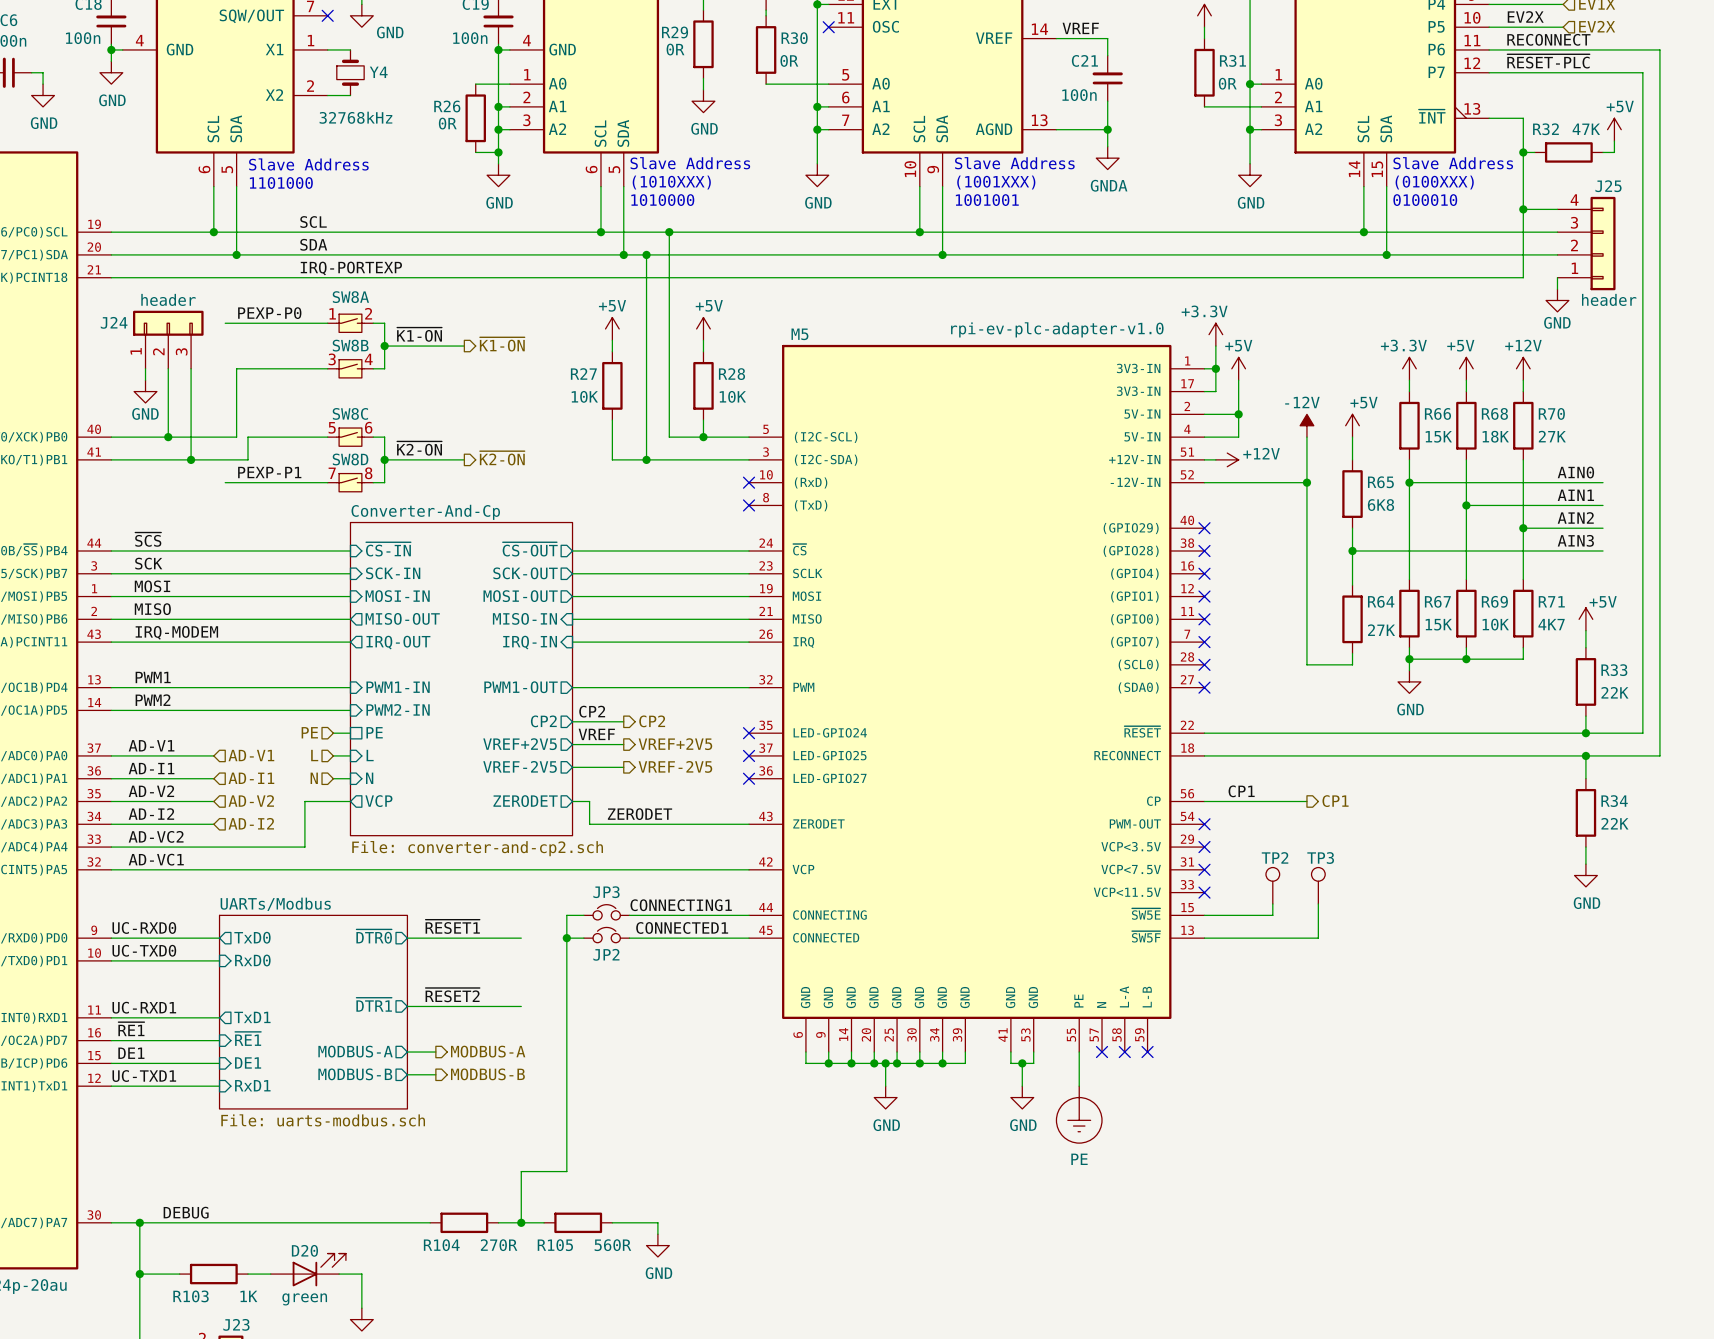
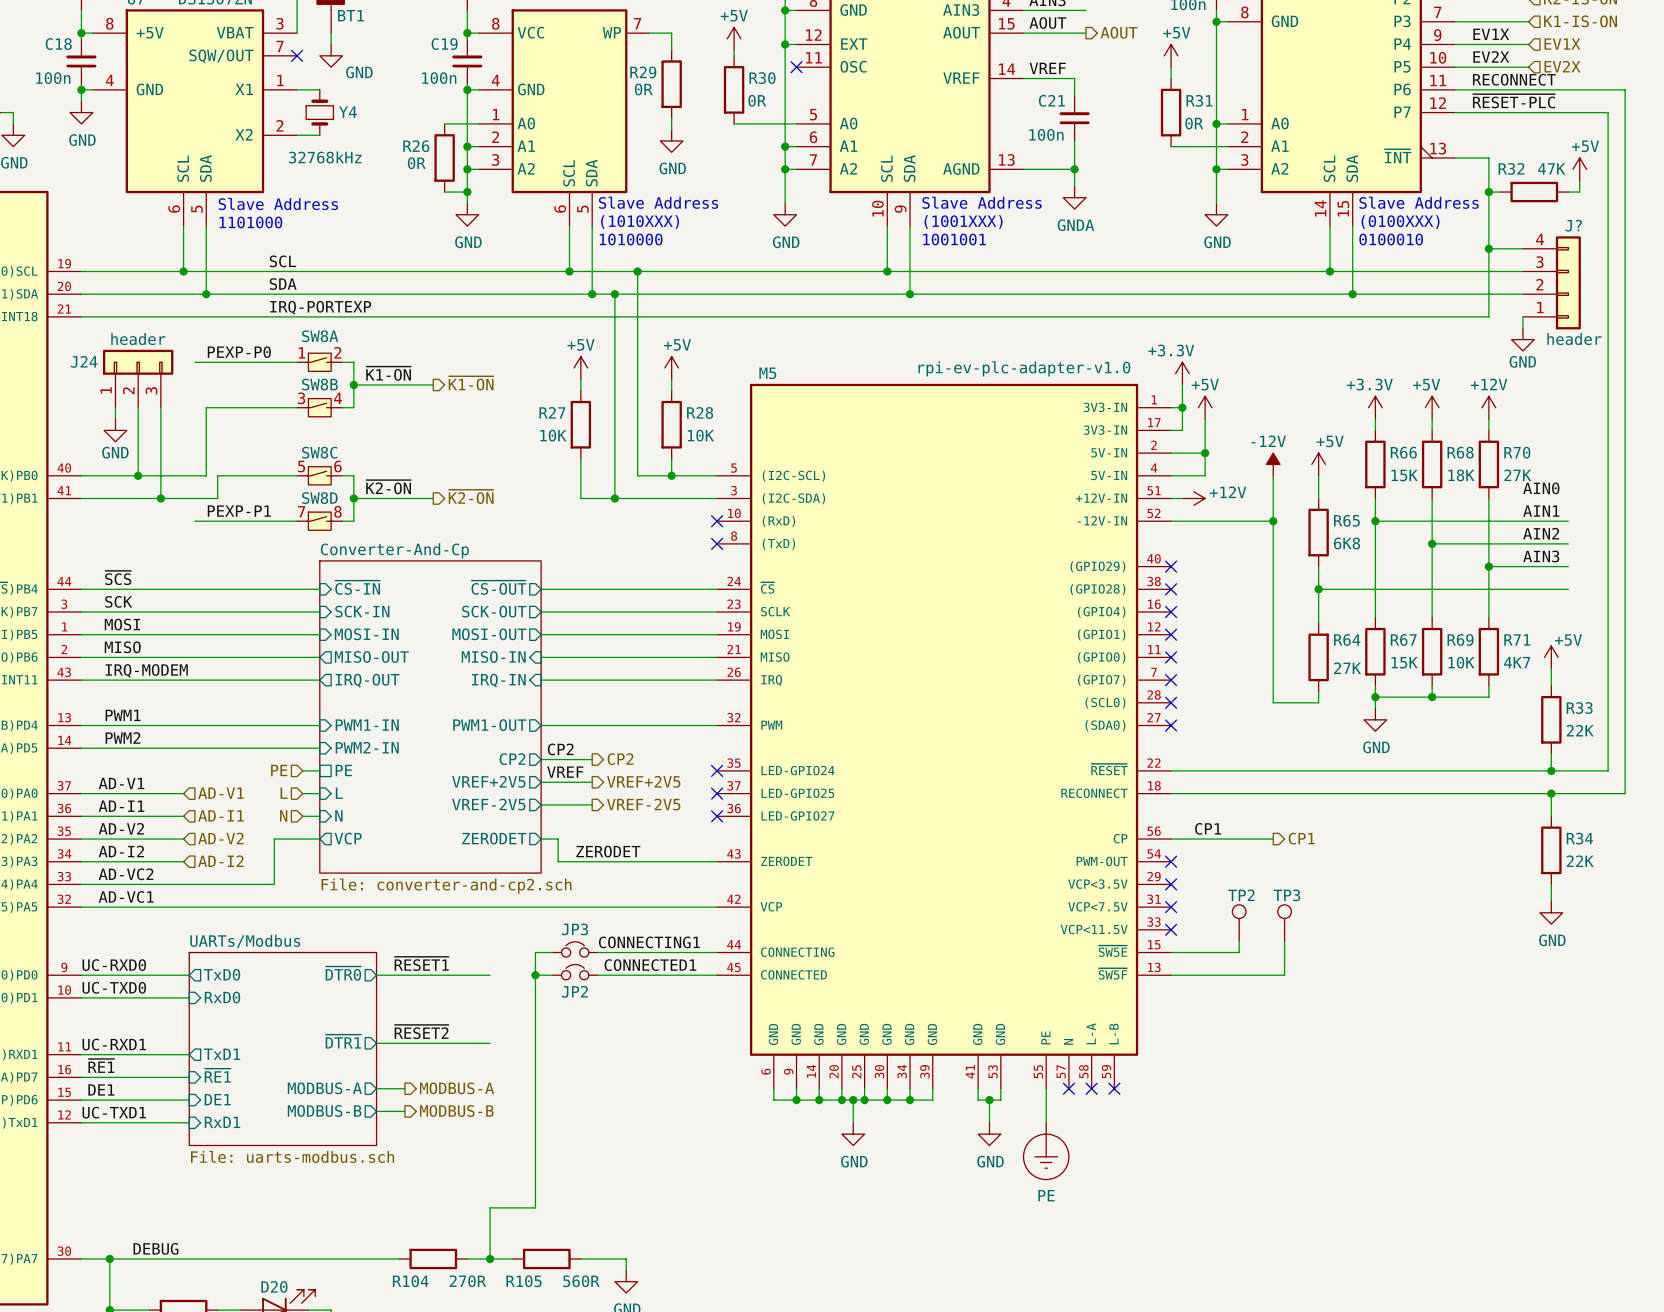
J25 name: J25 (1608, 186) -> J? (1573, 225)
label: none -> AIN0 (1541, 488)
label: AIN0 (1575, 472) -> AIN1 (1541, 511)
label: AIN1 (1575, 495) -> AIN2 (1541, 533)
label: AIN2 (1575, 517) -> AIN3 (1541, 556)
label: AIN3 (1575, 540) -> none

